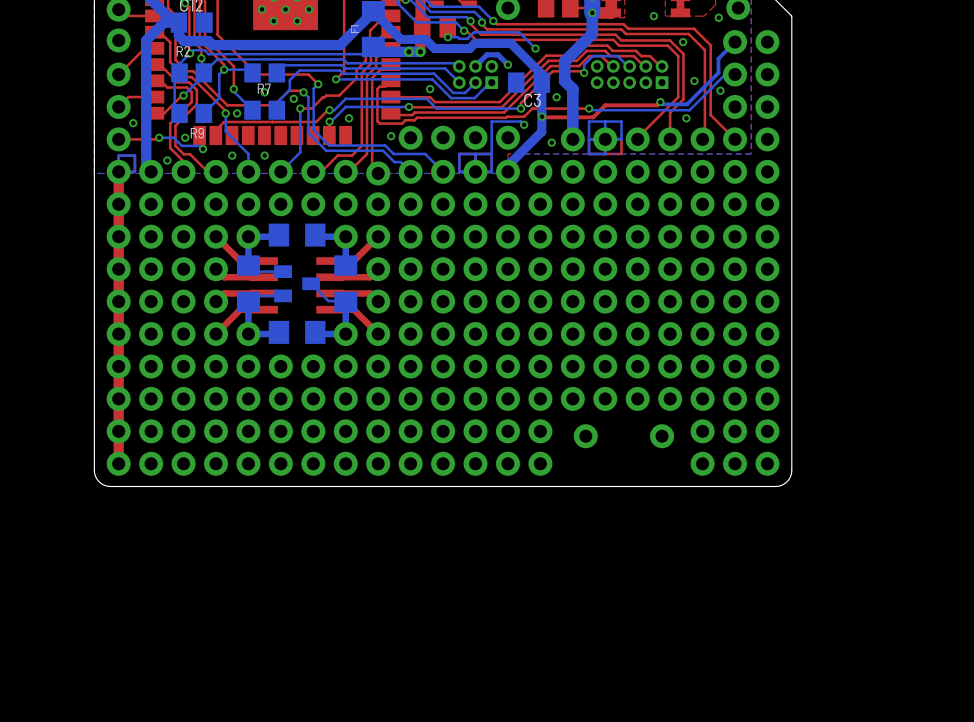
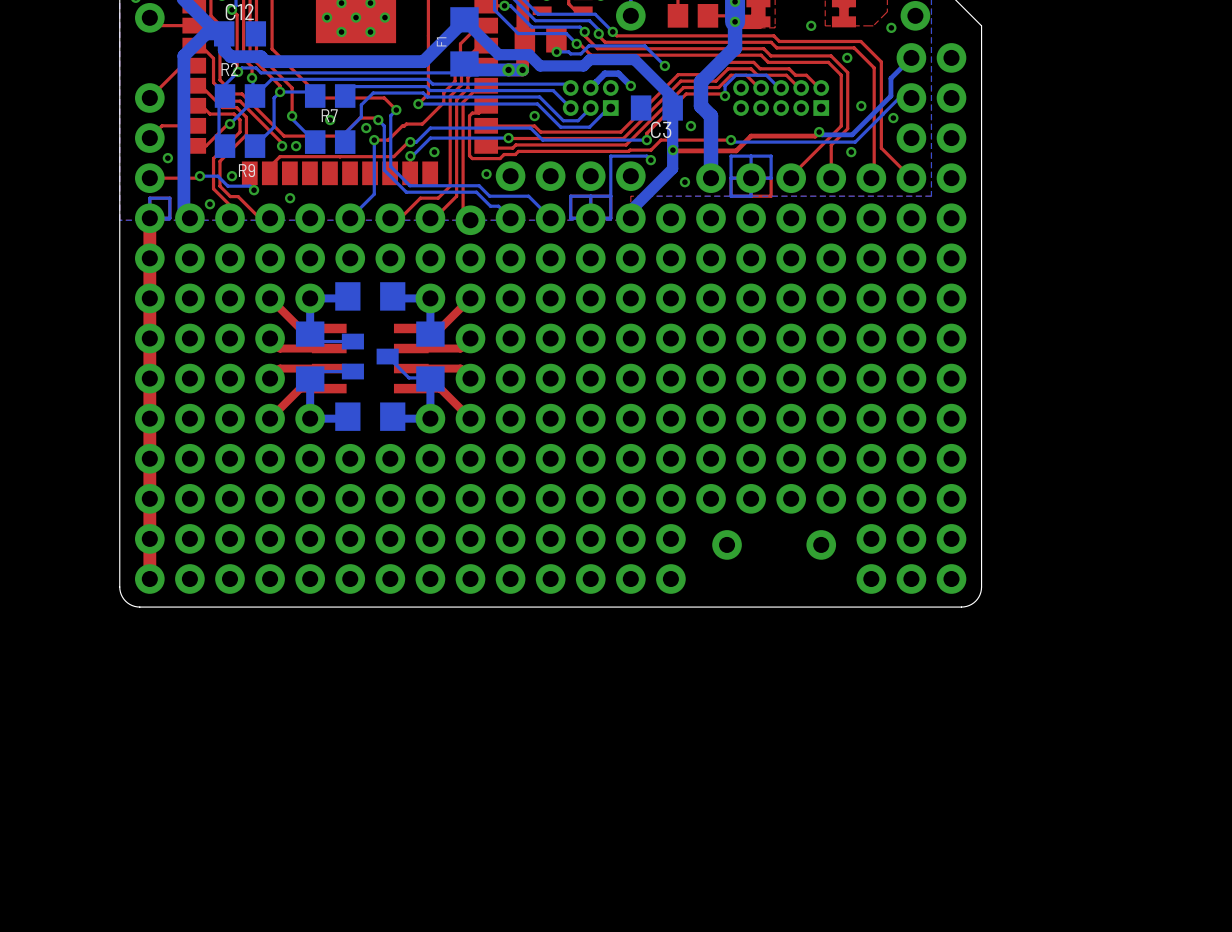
part: (118, 40) -> none
bottom track: (225, 113) (225, 131) (248, 154) (248, 171) -> none
via: (264, 155) -> none

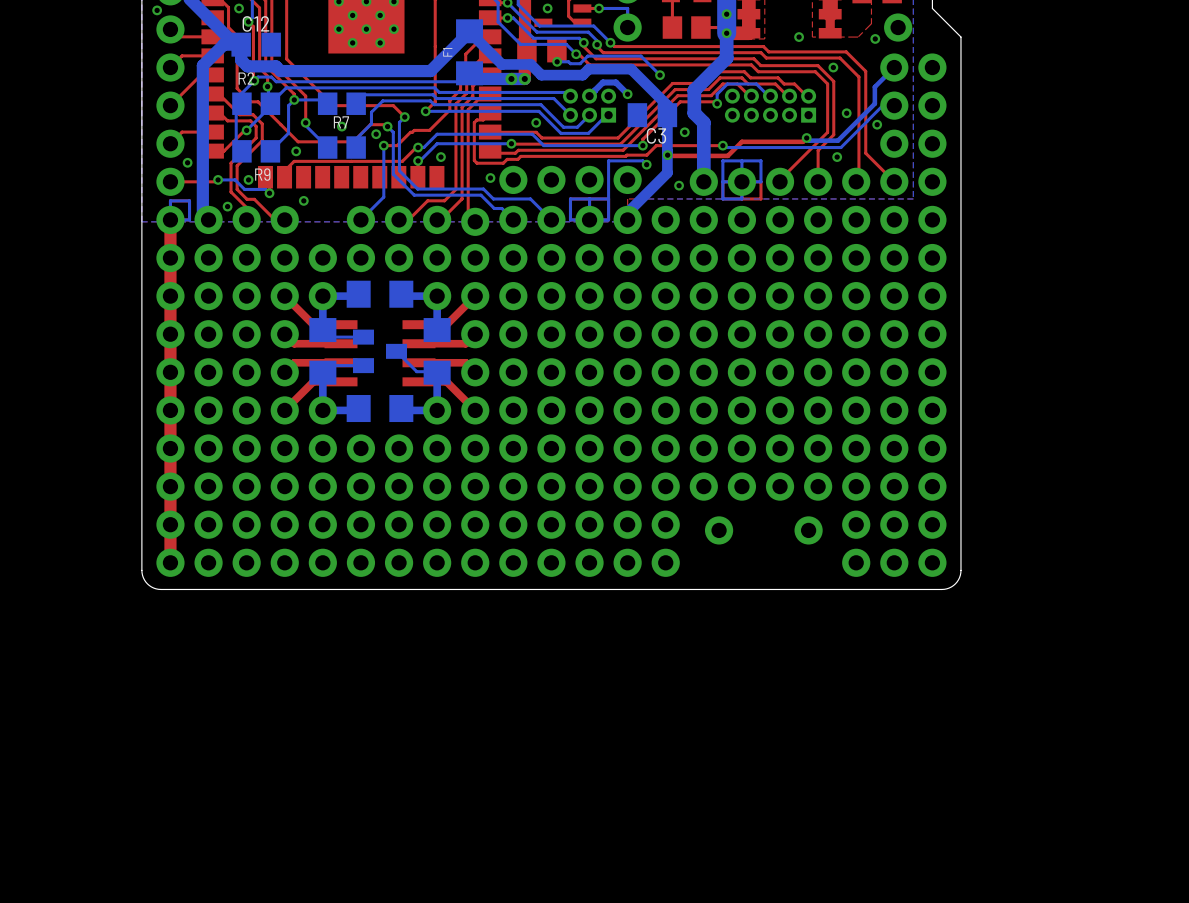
top track: (194, 45) (197, 48) (203, 48) (213, 58) (213, 82) (232, 101) (240, 101) (282, 143) (282, 146) -> (212, 55) (182, 55) (170, 67)
via: (296, 146) -> none
part position: (310, 218) -> (170, 67)

